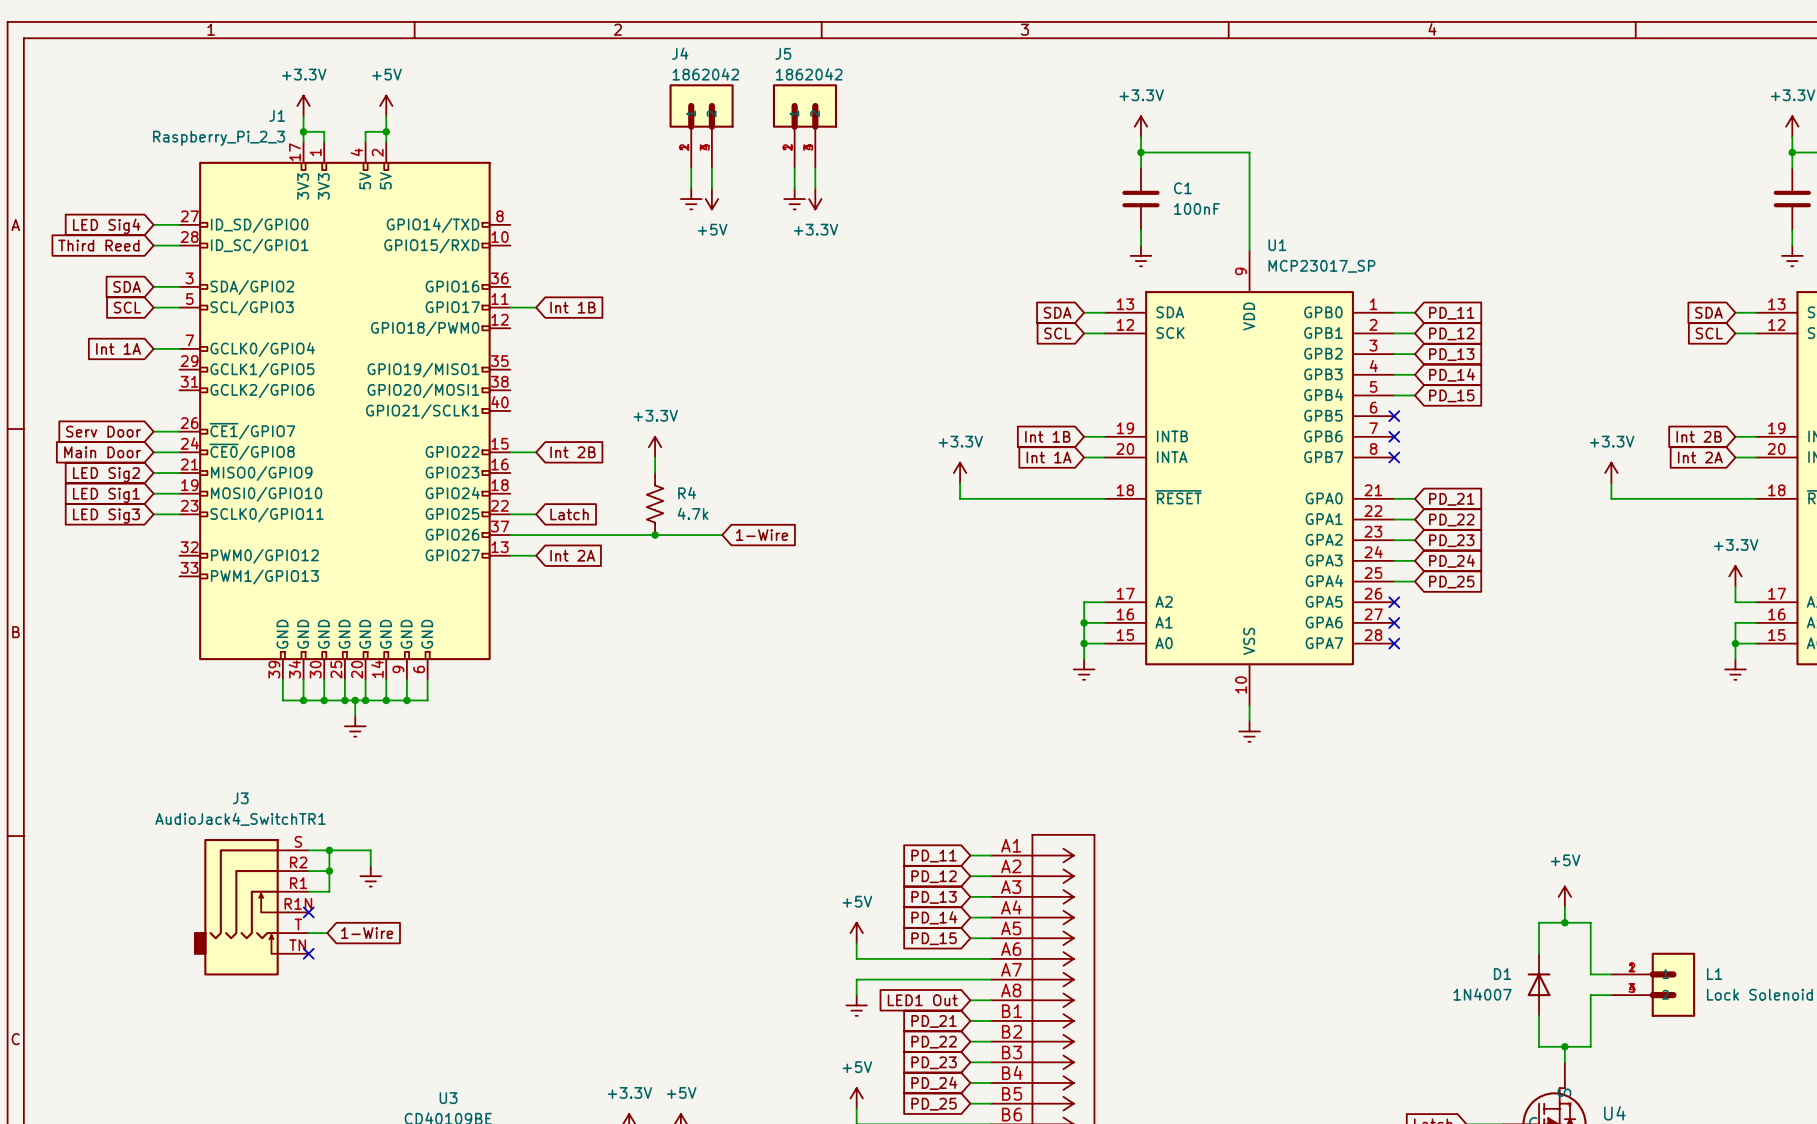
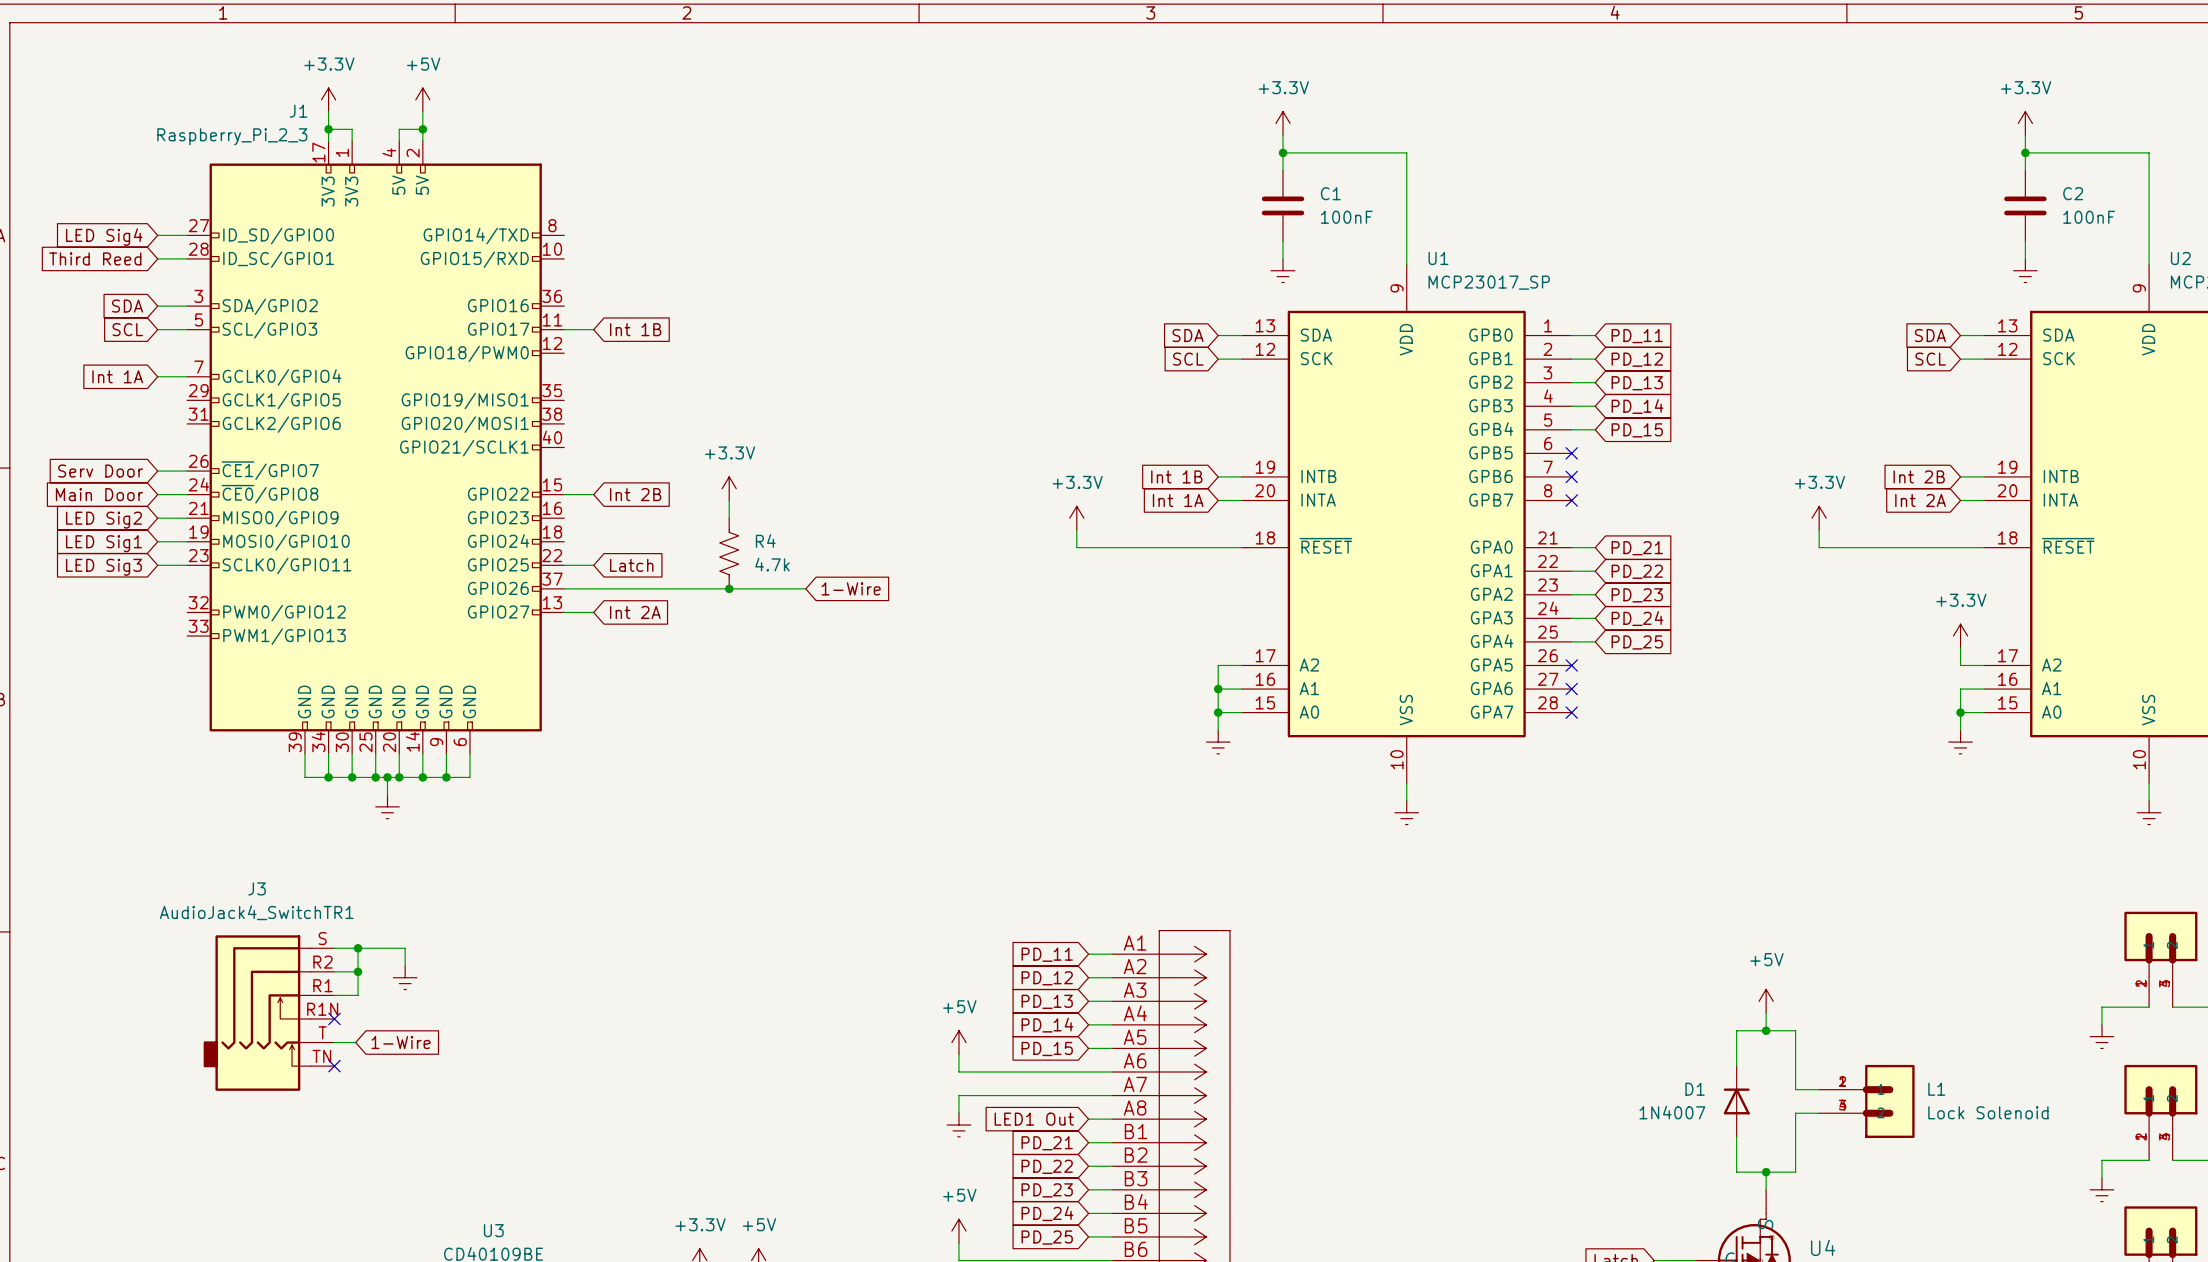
J4: 1862042 (701, 126) -> none
J5: 1862042 (804, 126) -> none
wire: (691, 168) (691, 188) -> none
wire: (711, 168) (711, 188) -> none
wire: (794, 168) (794, 188) -> none
wire: (815, 168) (815, 188) -> none
power symbol: (691, 199) -> none
power symbol: +5V (711, 199) -> none
power symbol: (794, 199) -> none
power symbol: +3.3V (815, 199) -> none

